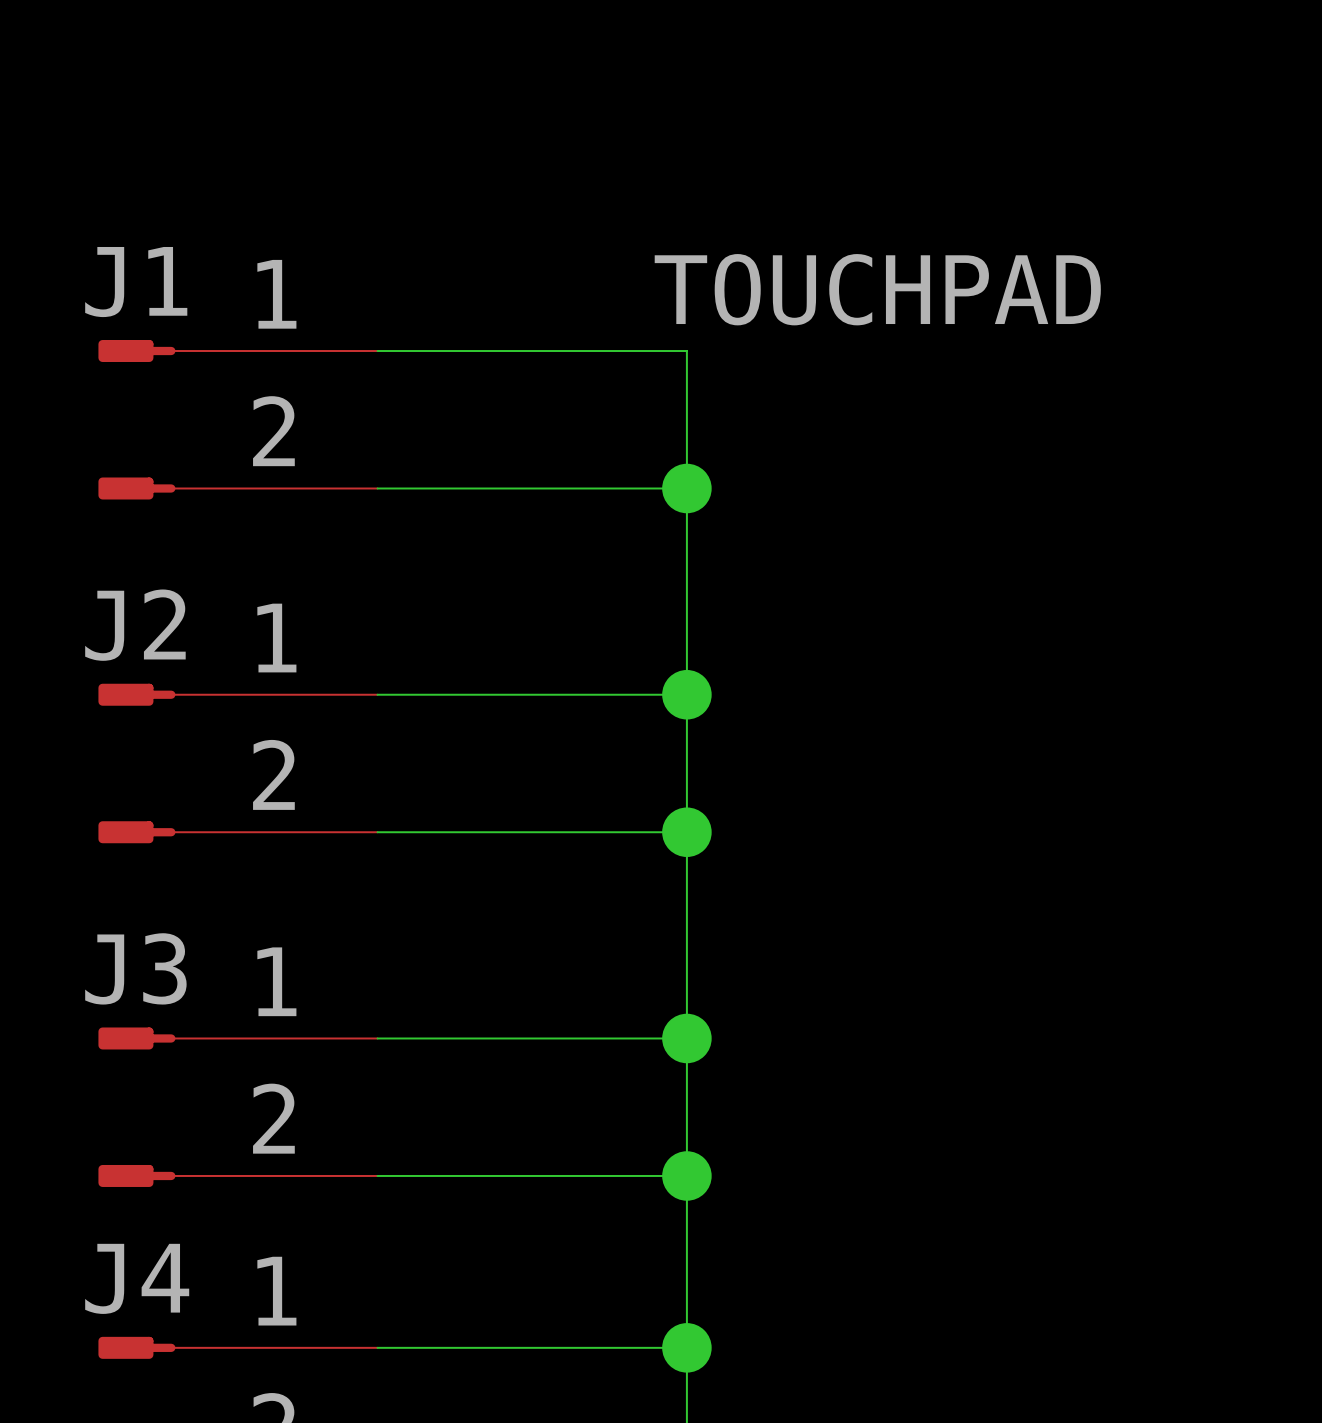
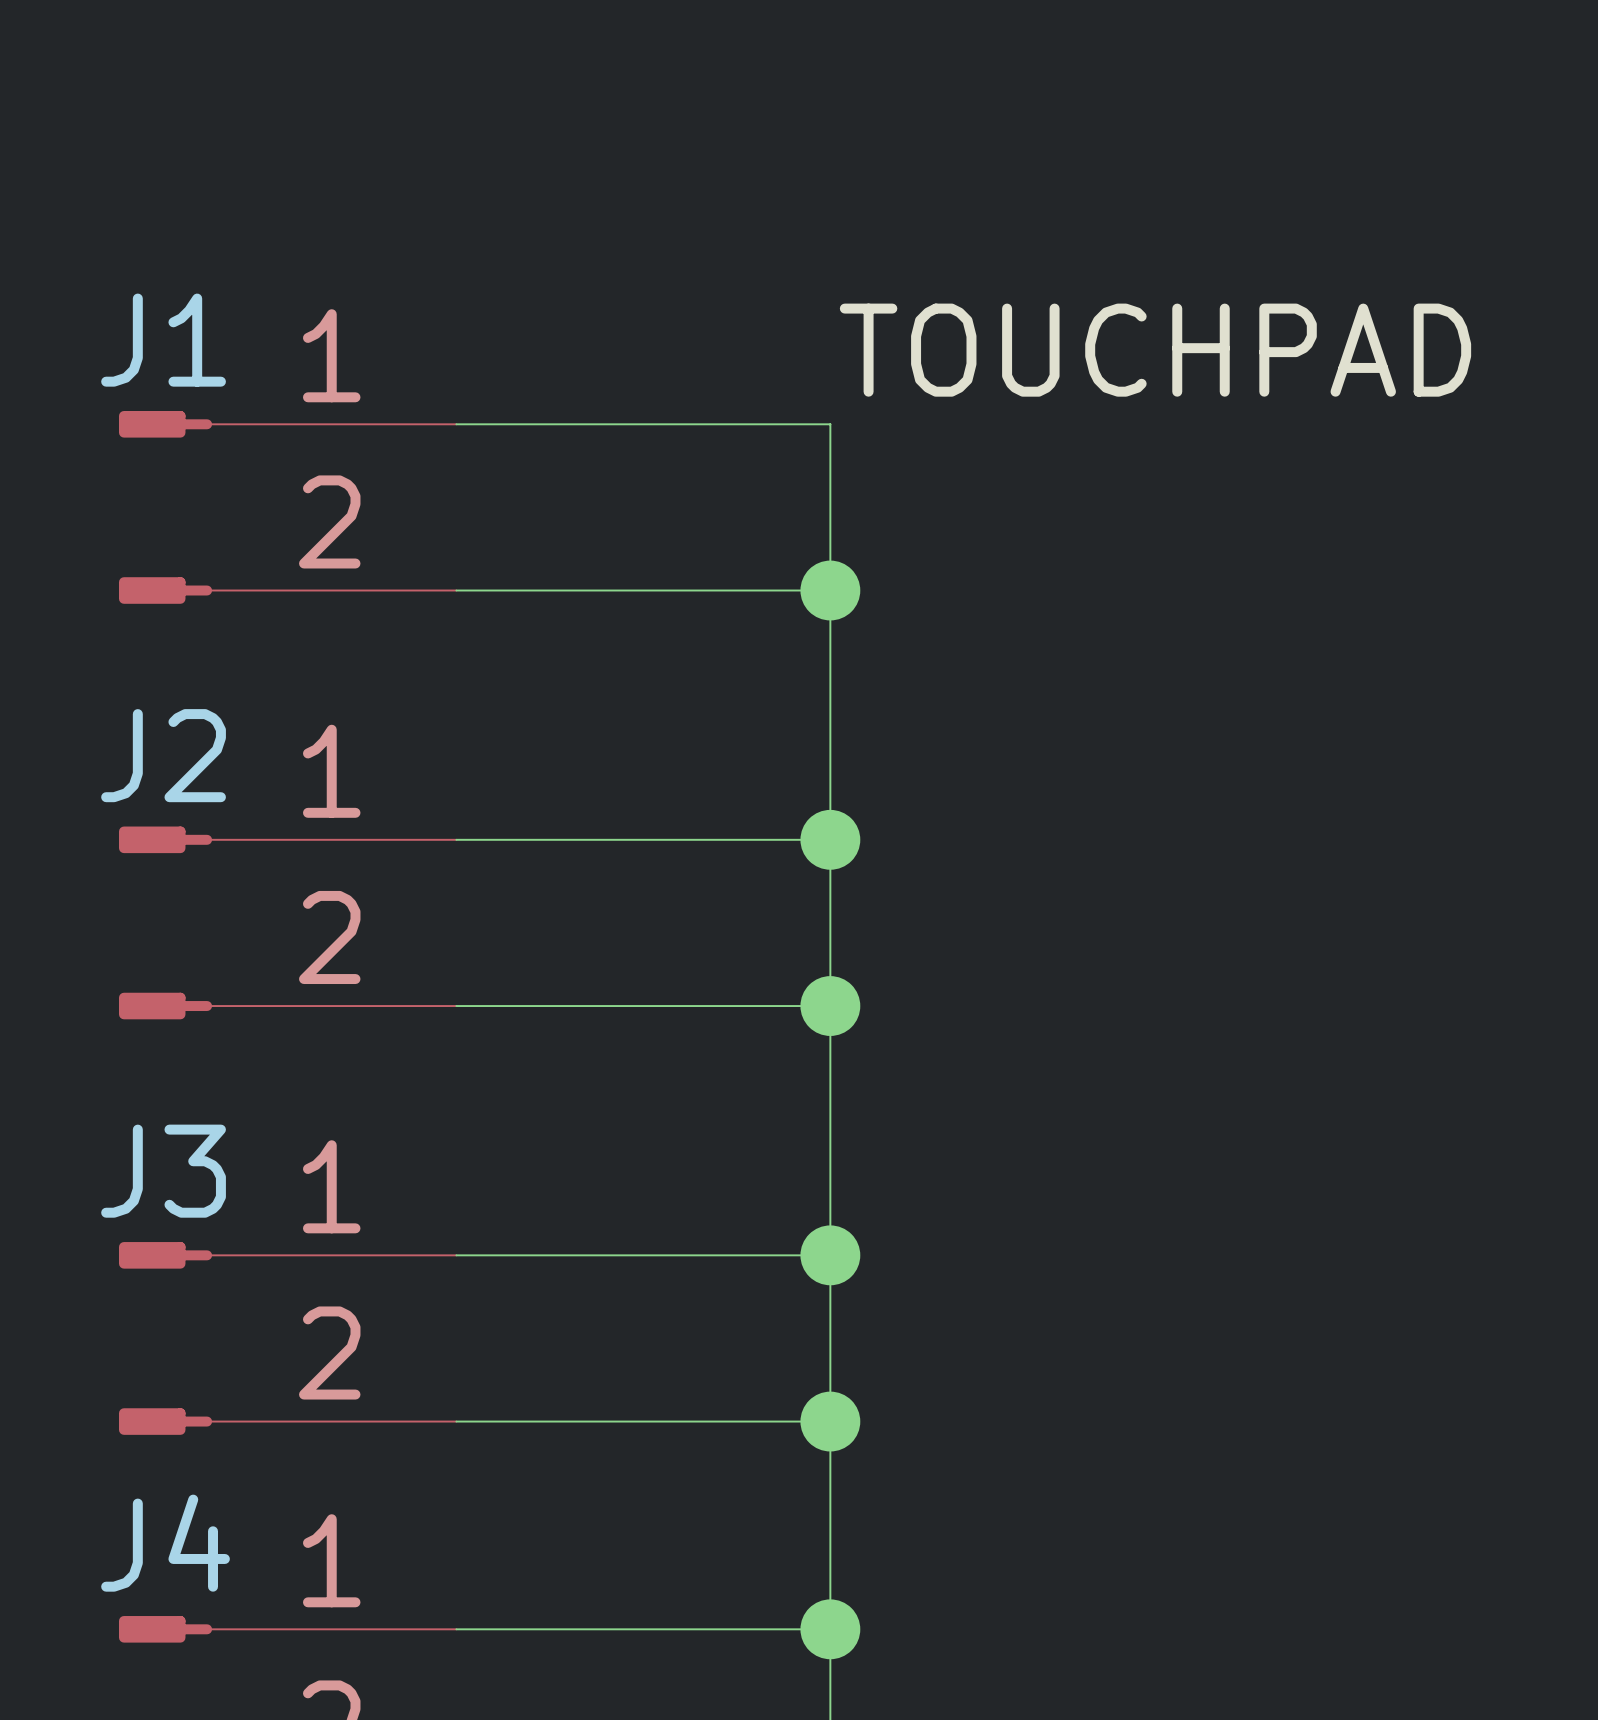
label position: TOUCHPAD (877, 289) -> TOUCHPAD (1155, 350)

